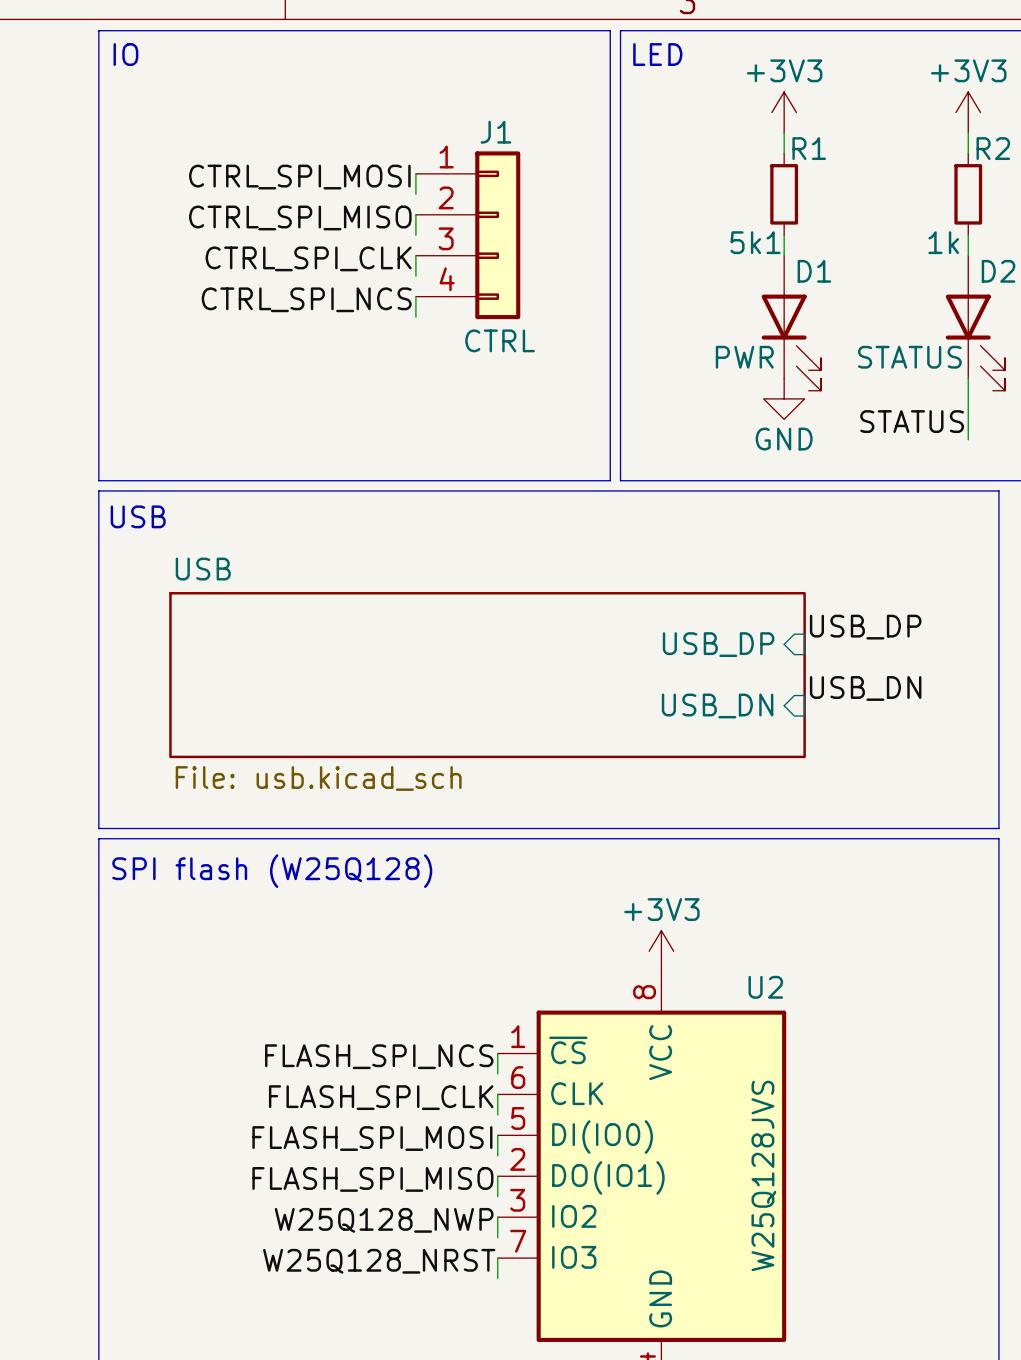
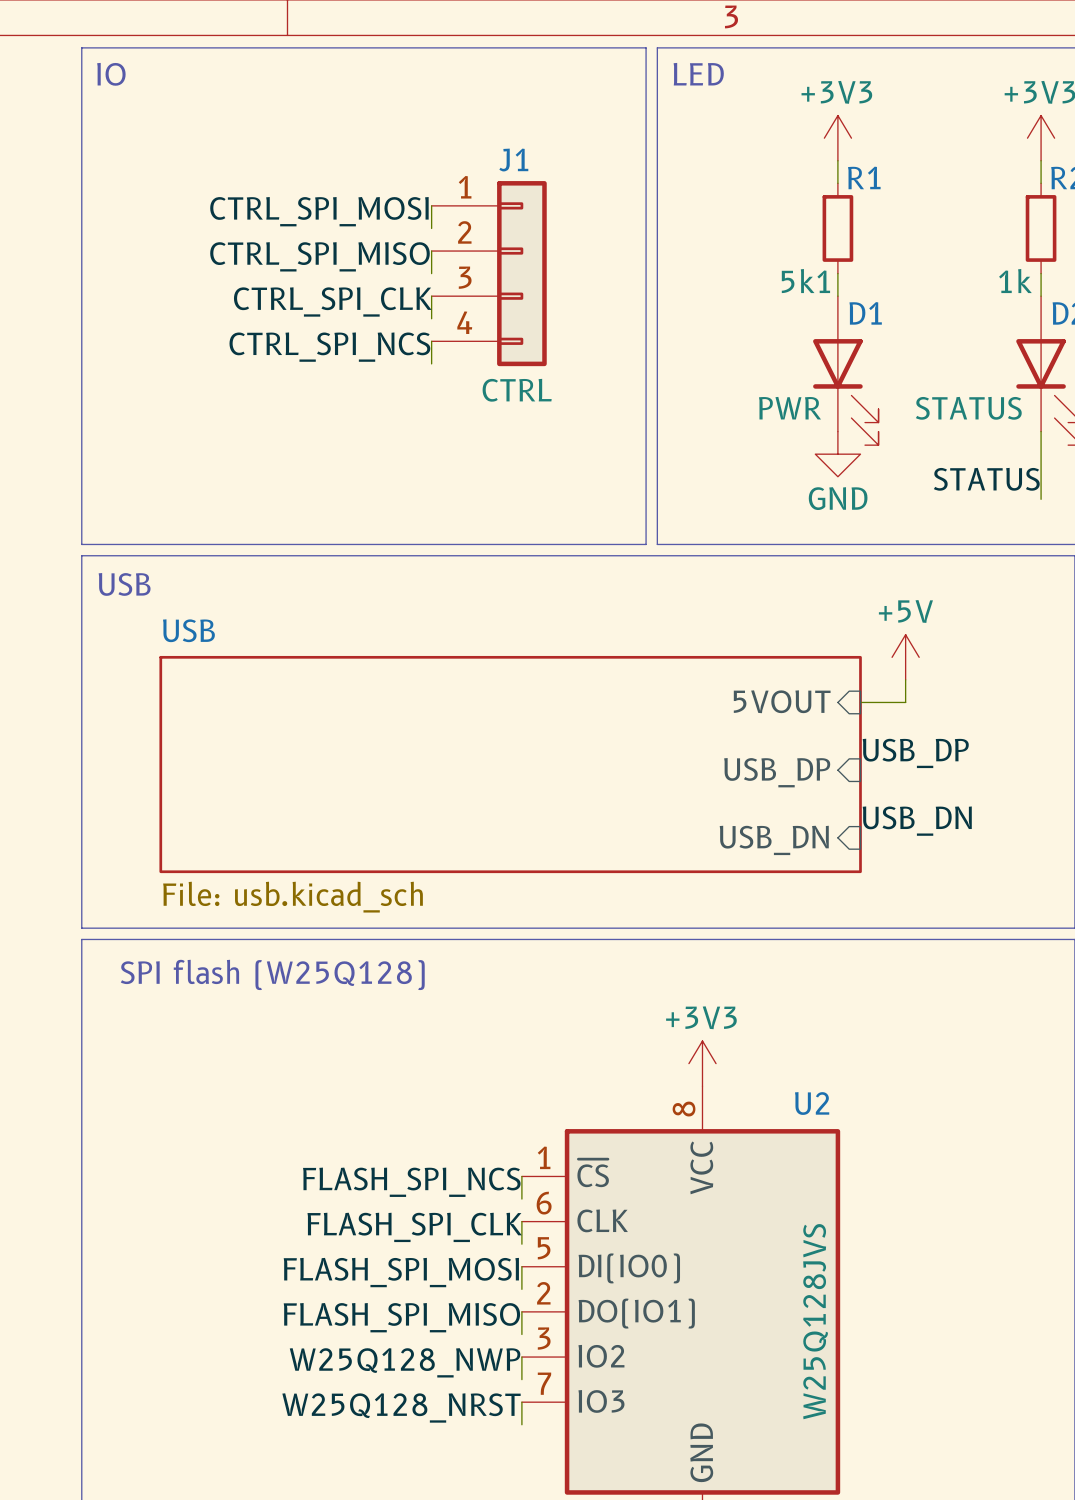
power symbol: none -> +5V (905, 657)
sheet USB shape: [169, 592, 806, 759] -> [159, 655, 862, 874]
wire: none -> (905, 679) (905, 702) (860, 702)
sheet pin: none -> 5VOUT (782, 701)
label position: USB_DP (865, 627) -> USB_DP (915, 753)
sheet pin position: USB_DP (718, 644) -> USB_DP (777, 772)
label position: USB_DN (865, 688) -> USB_DN (917, 821)
sheet pin position: USB_DN (717, 705) -> USB_DN (774, 840)

